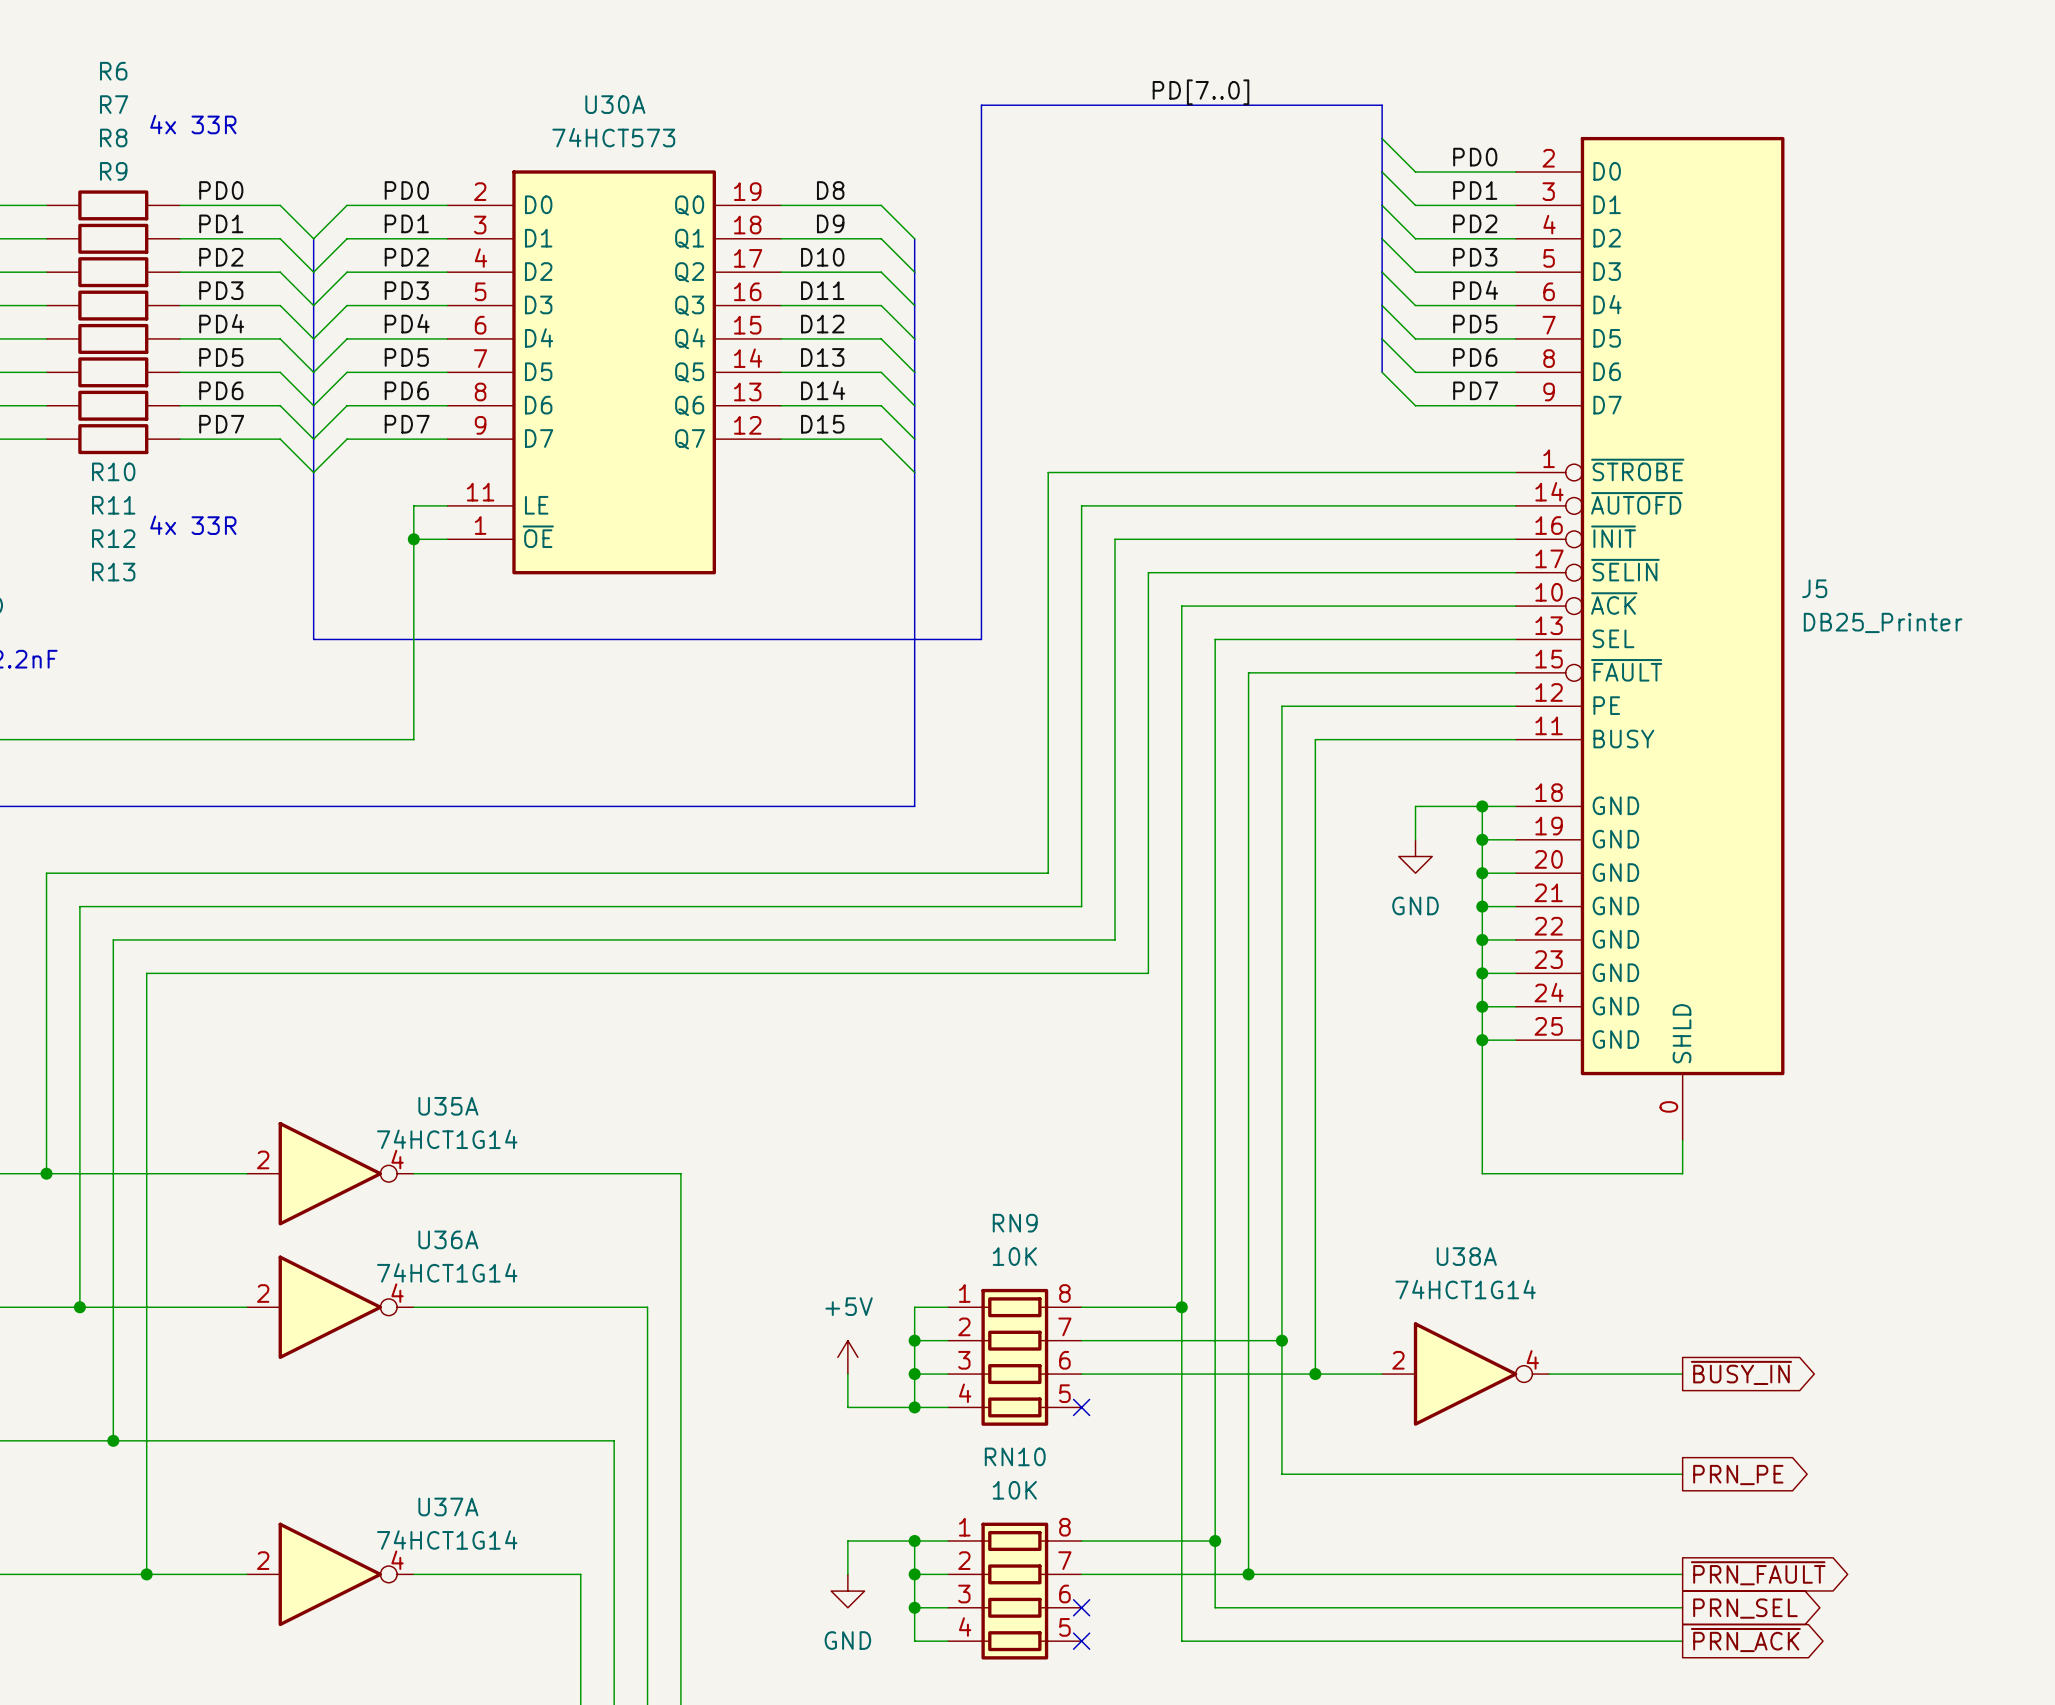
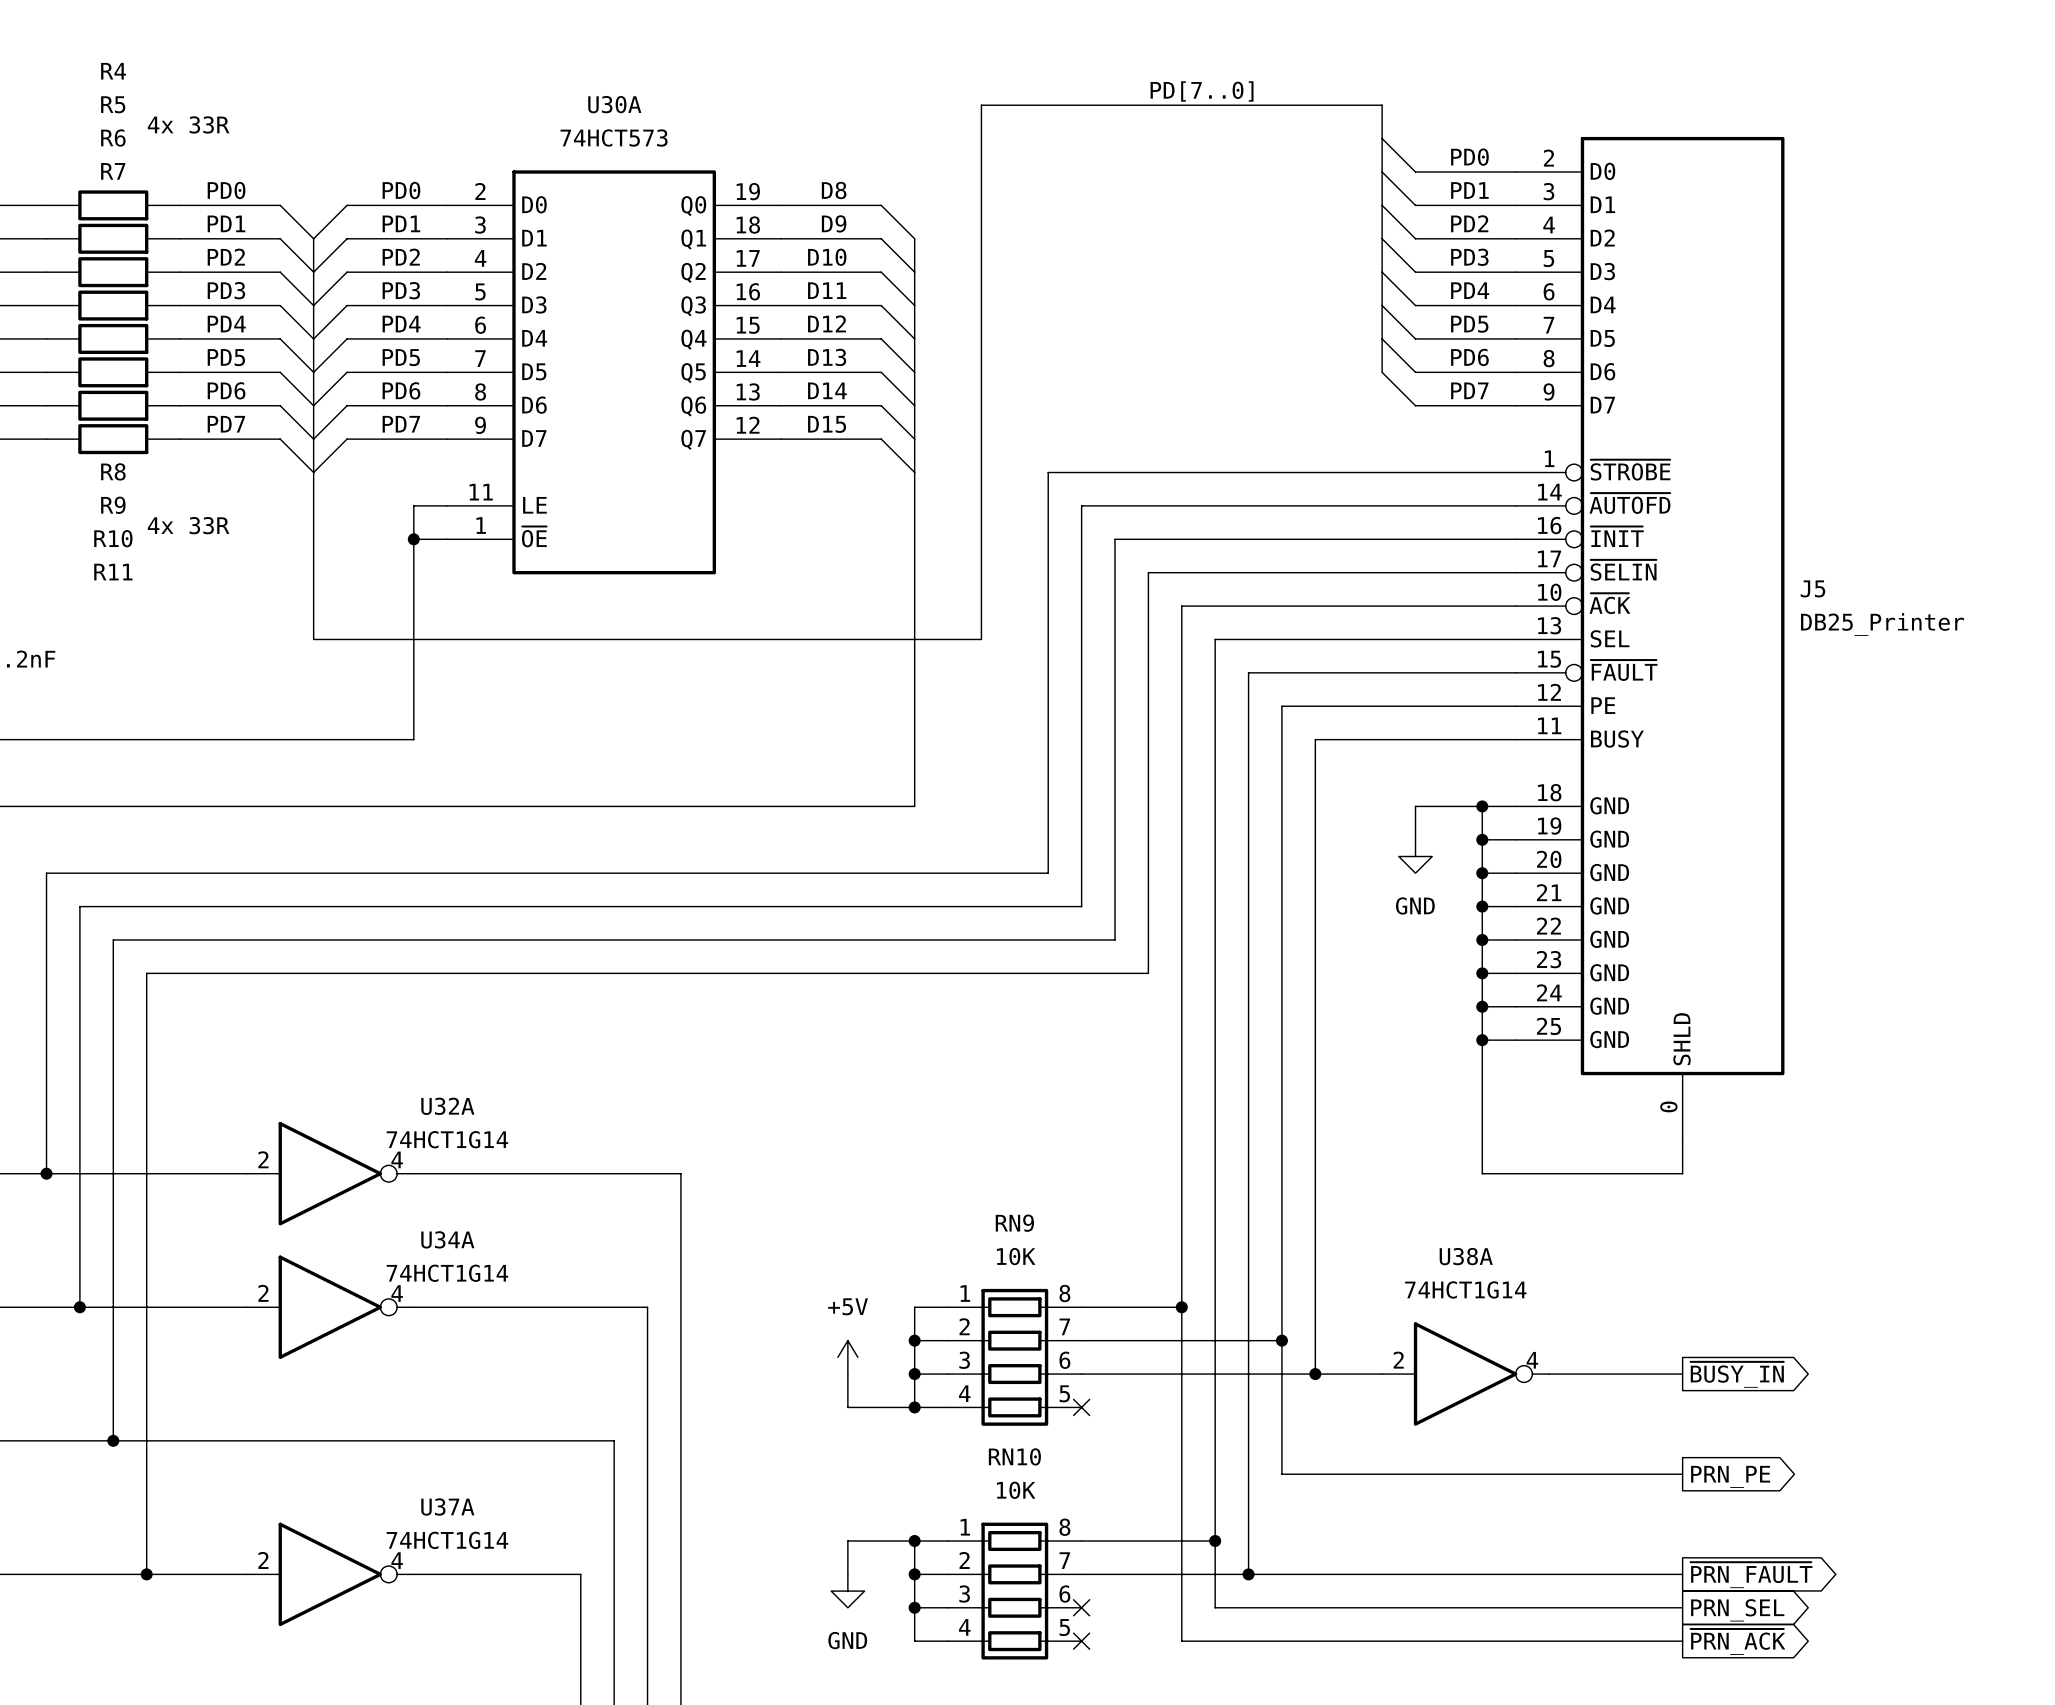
R6 name: R6 (113, 71) -> R4 (113, 71)
R7 name: R7 (114, 104) -> R5 (113, 104)
R8 name: R8 (113, 137) -> R6 (113, 138)
R9 name: R9 (113, 171) -> R7 (113, 171)
R10 name: R10 (113, 471) -> R8 (113, 471)
R11 name: R11 (113, 505) -> R9 (113, 505)
R12 name: R12 (113, 538) -> R10 (113, 538)
R13 name: R13 (113, 572) -> R11 (113, 572)
U35A name: U35A (448, 1106) -> U32A (447, 1106)
U36A name: U36A (448, 1239) -> U34A (447, 1239)

